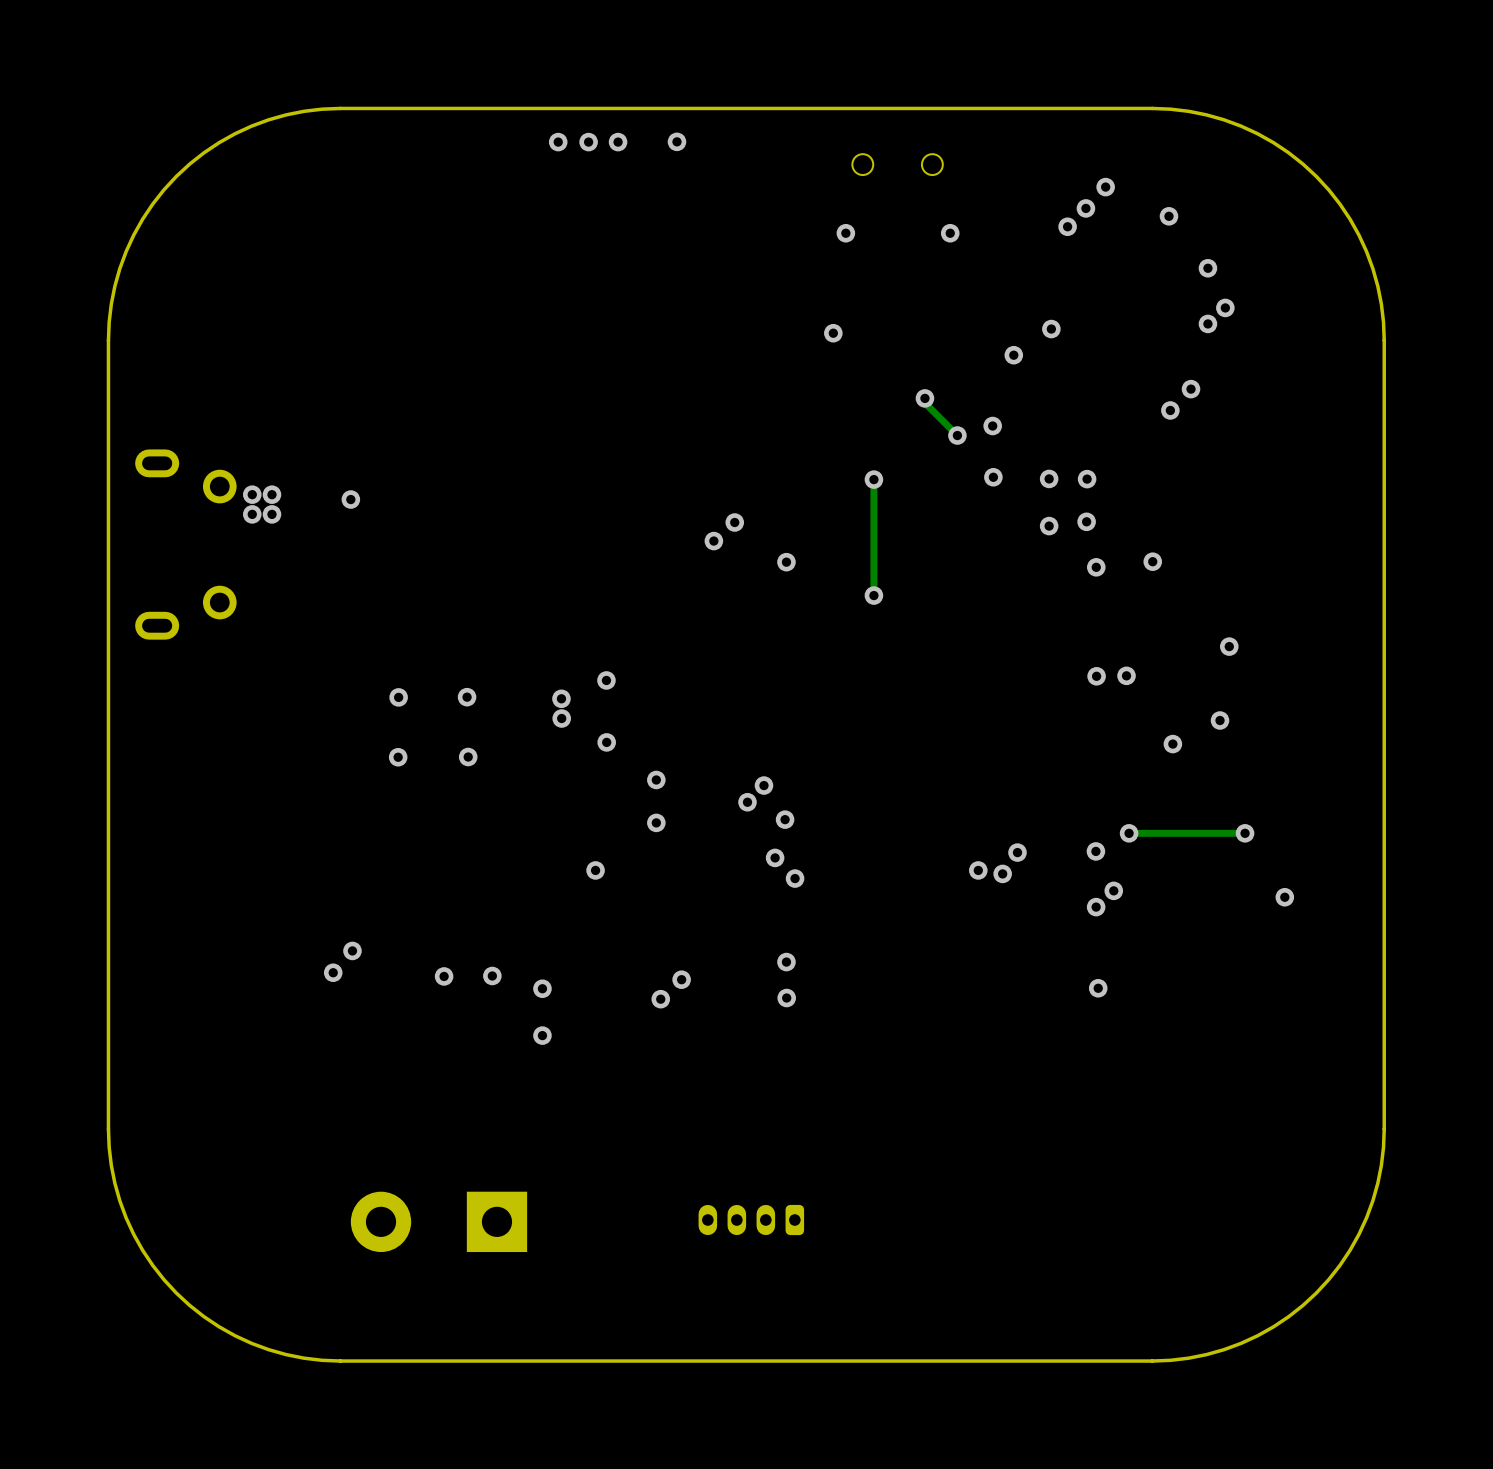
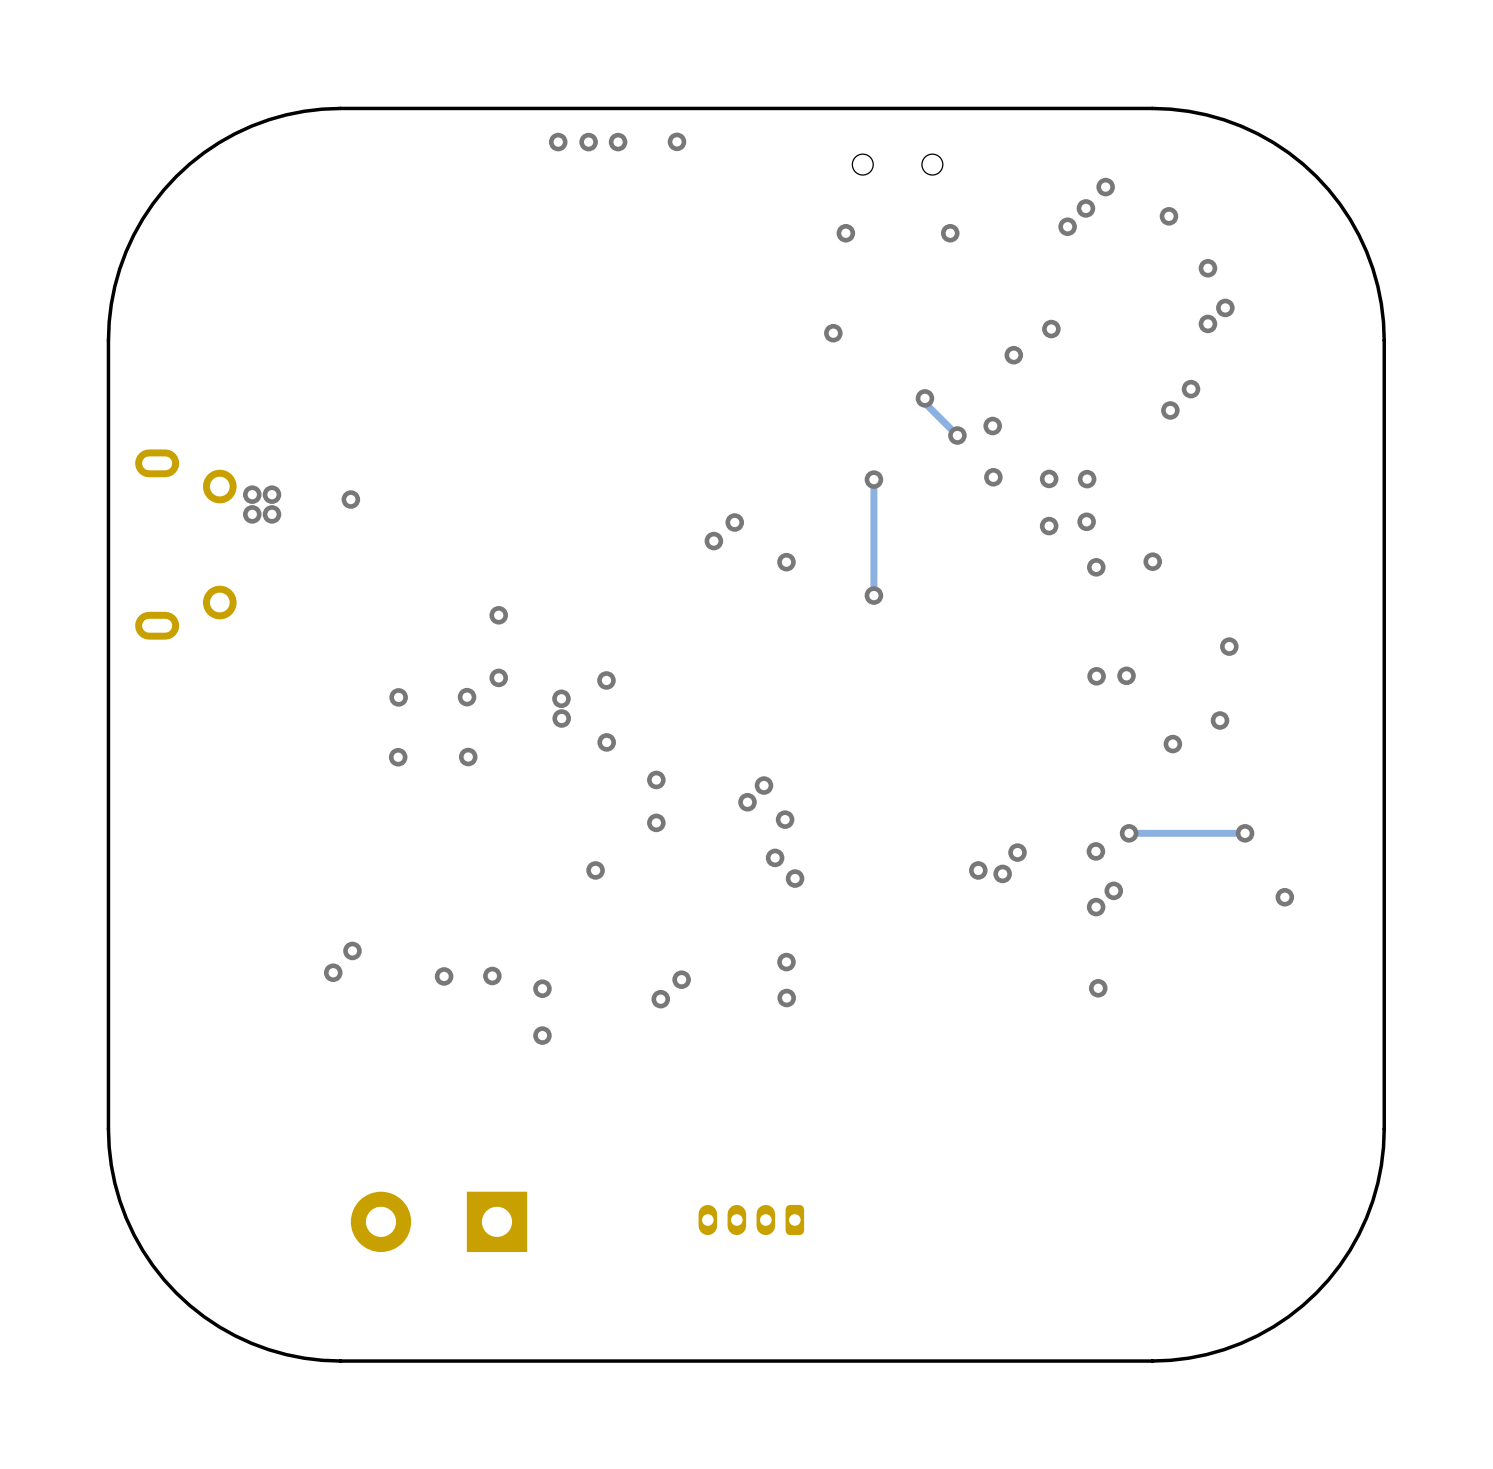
via: none -> (498, 615)
via: none -> (498, 677)

